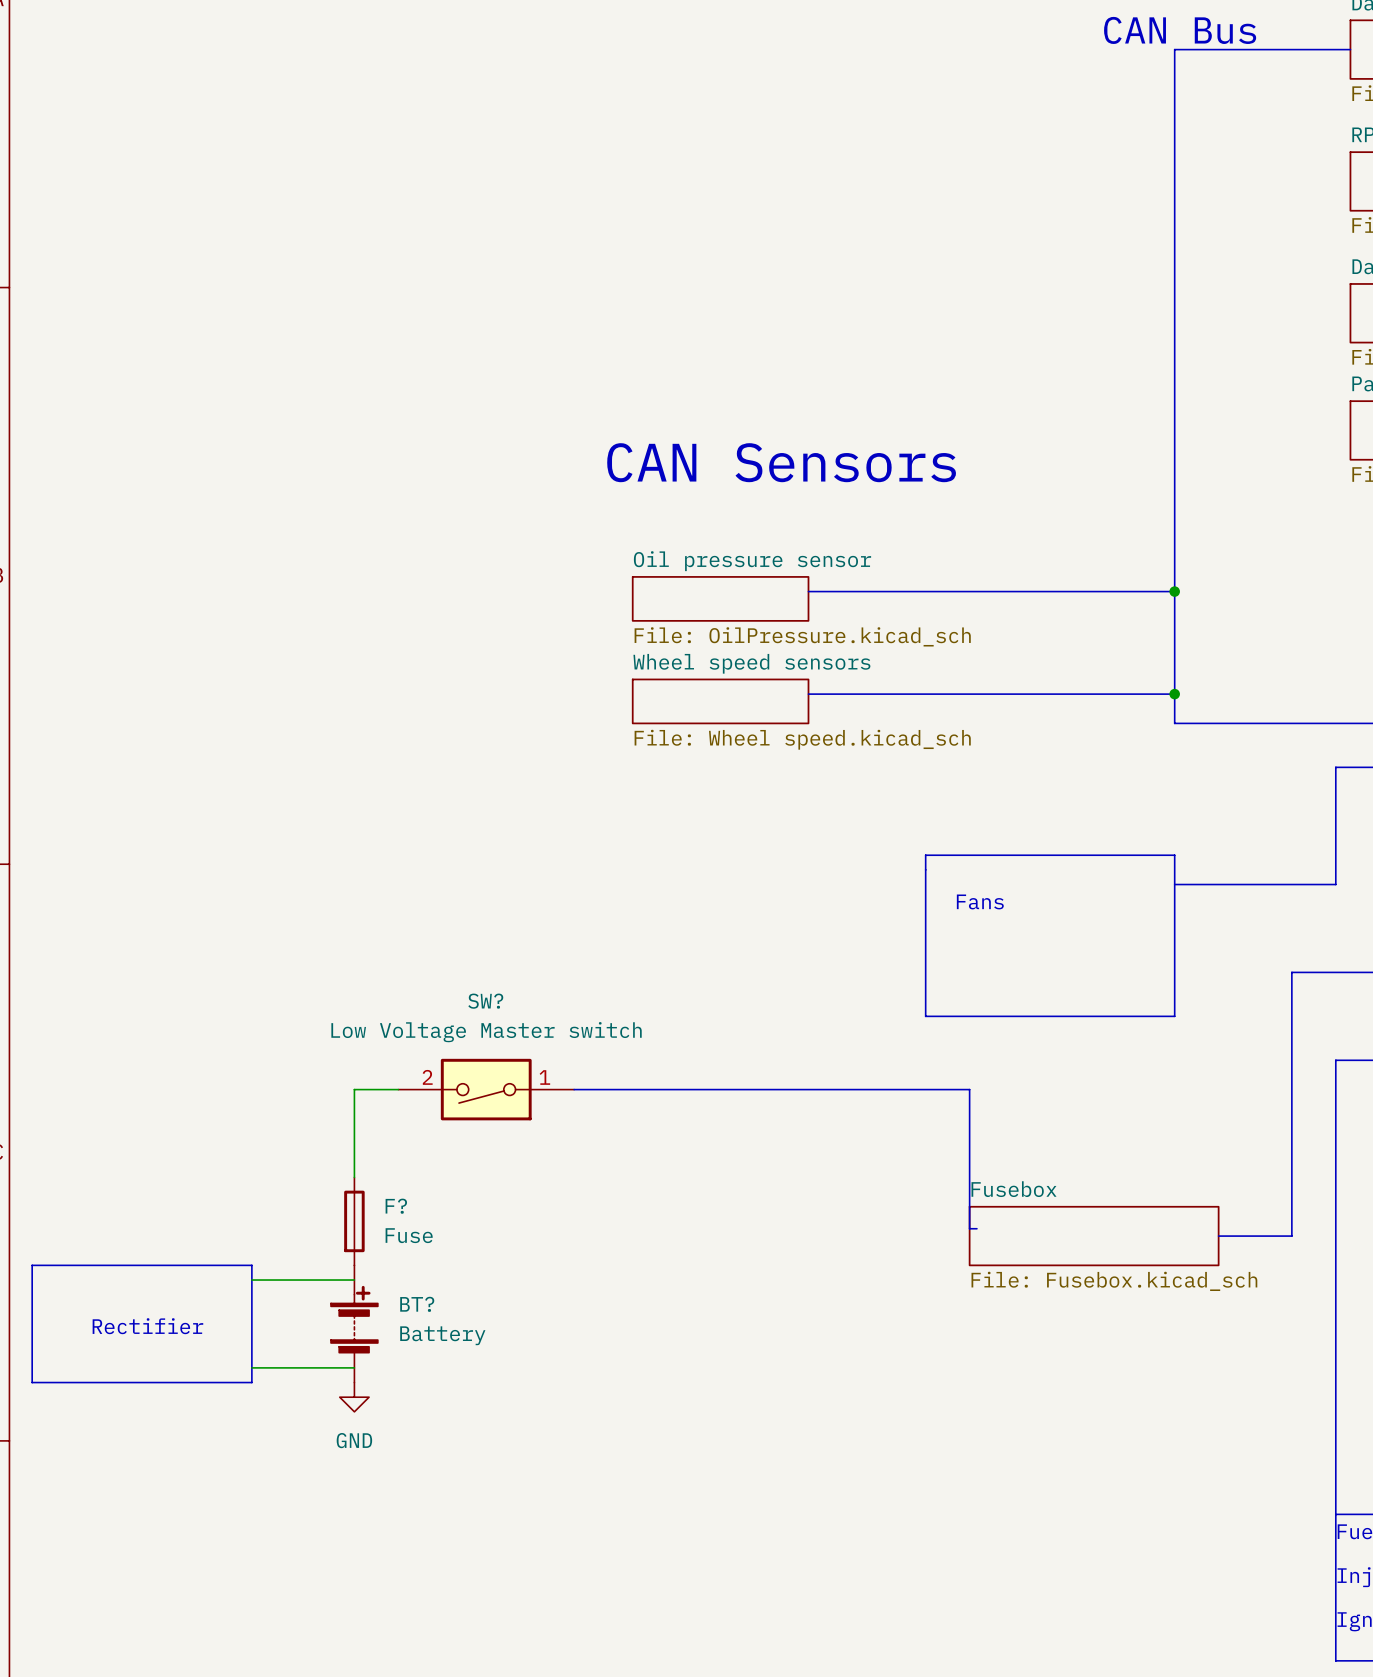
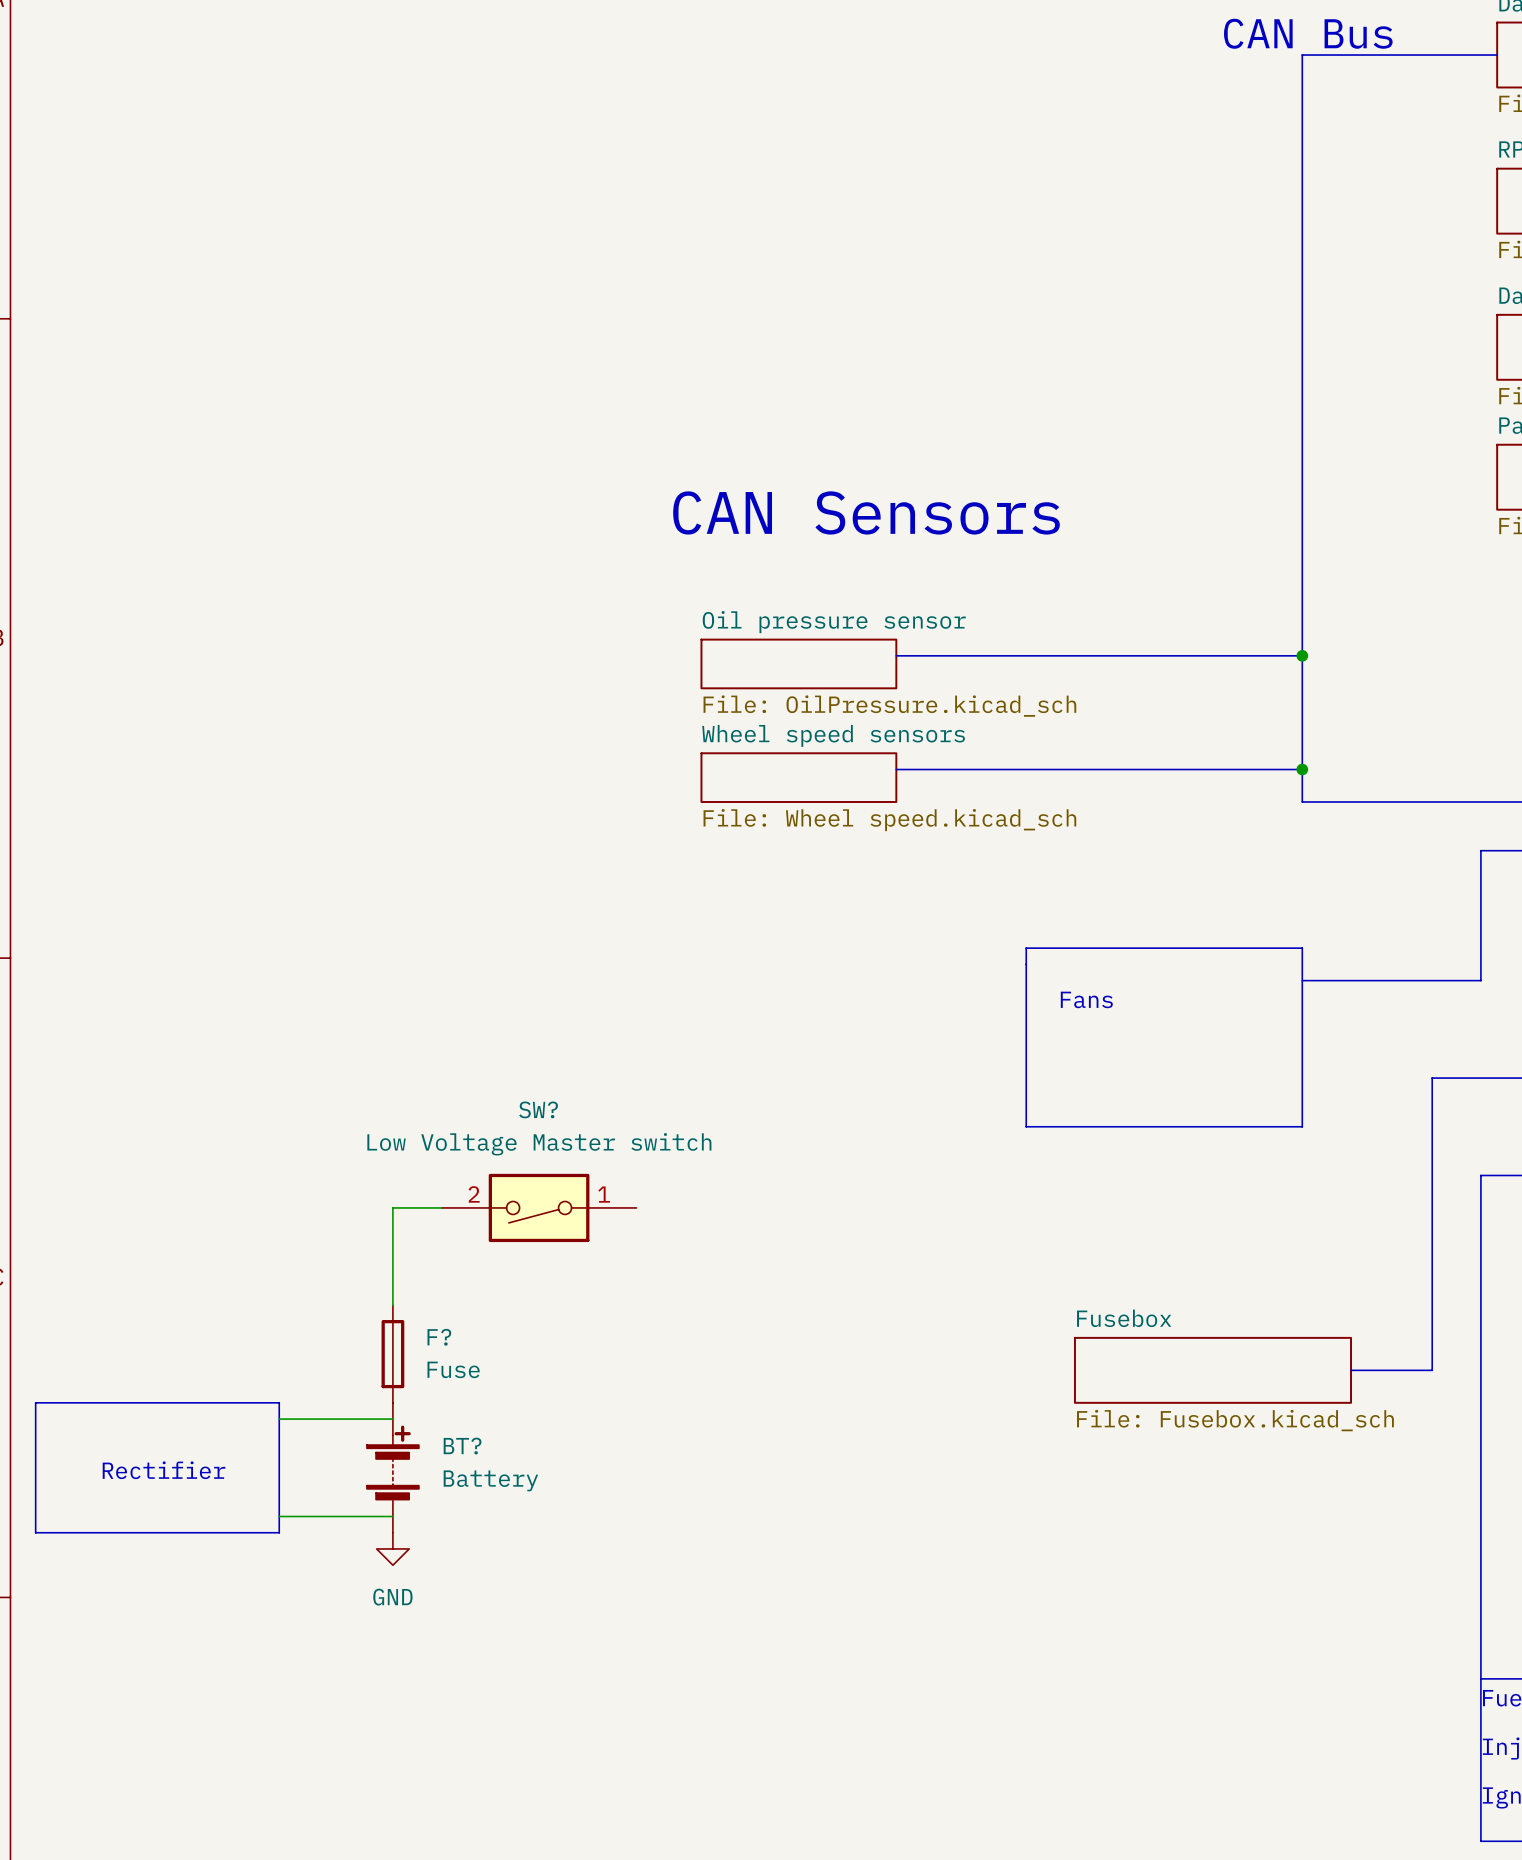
bus: (574, 1089) (969, 1089) (969, 1228) (976, 1228) -> none

